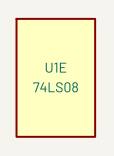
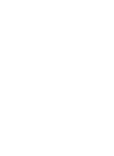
U1E: 74LS08 (55, 77) -> none

